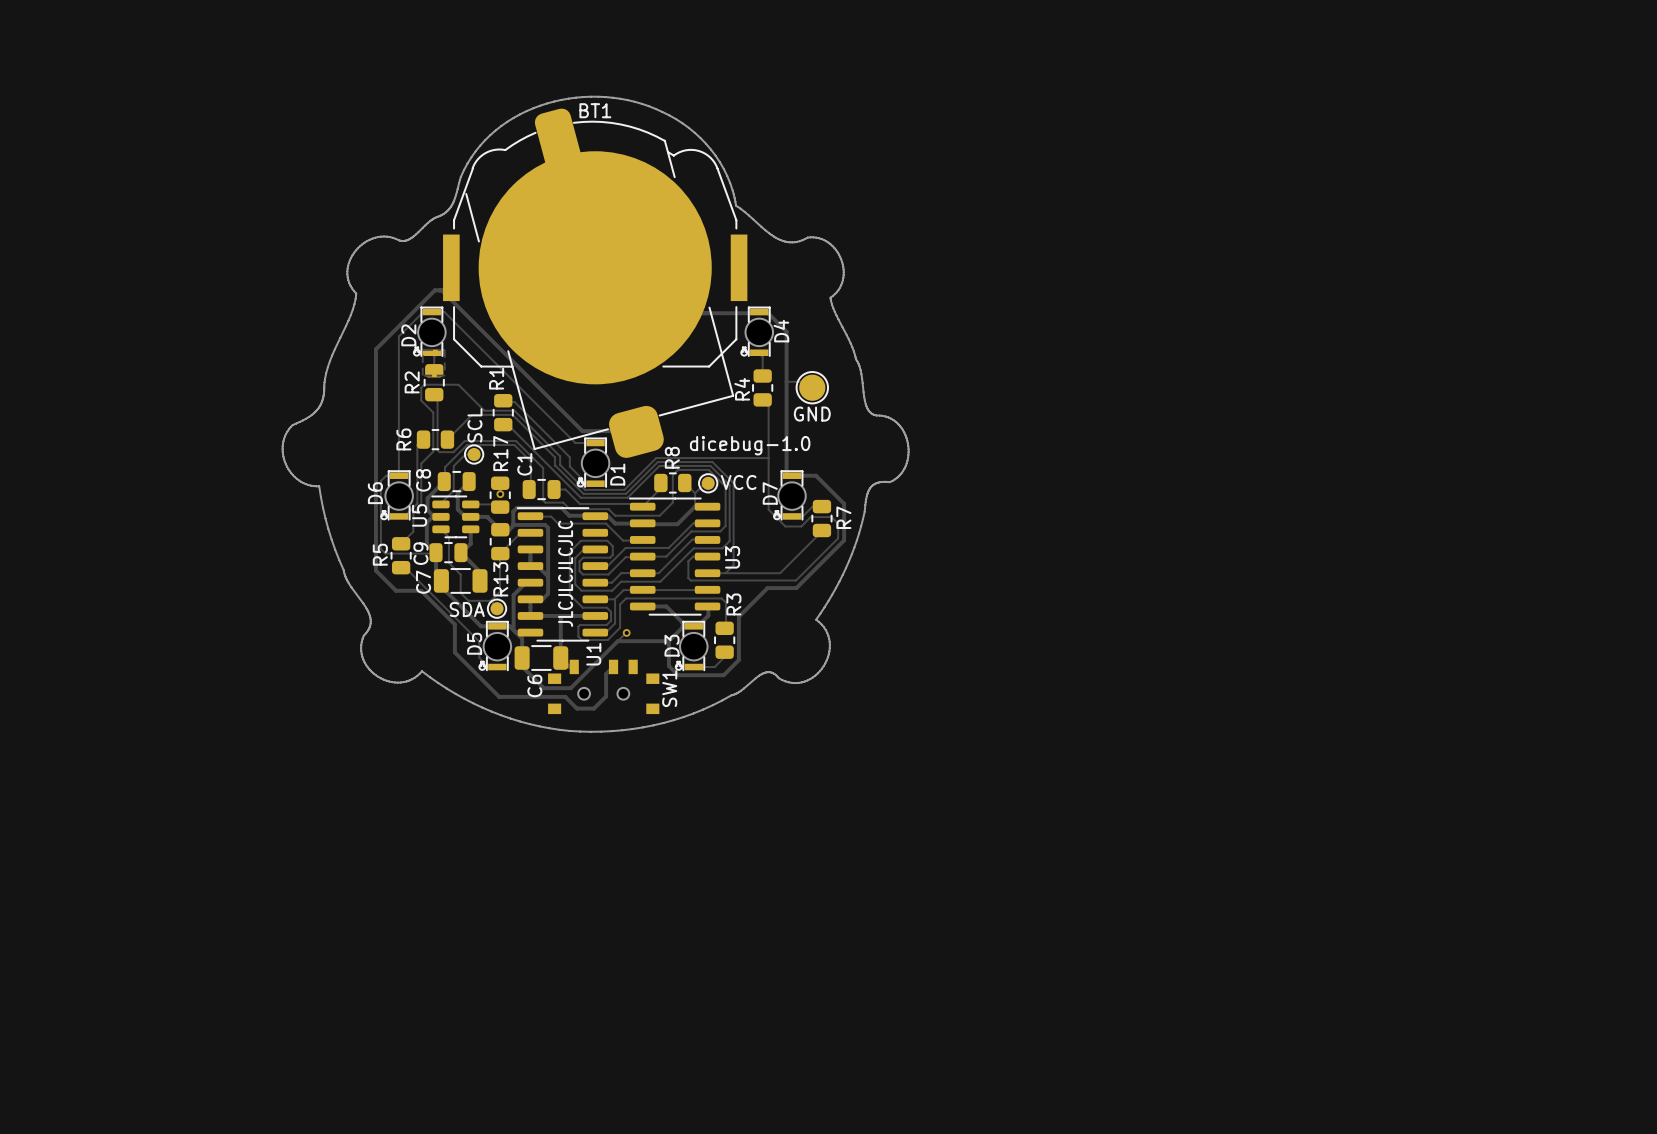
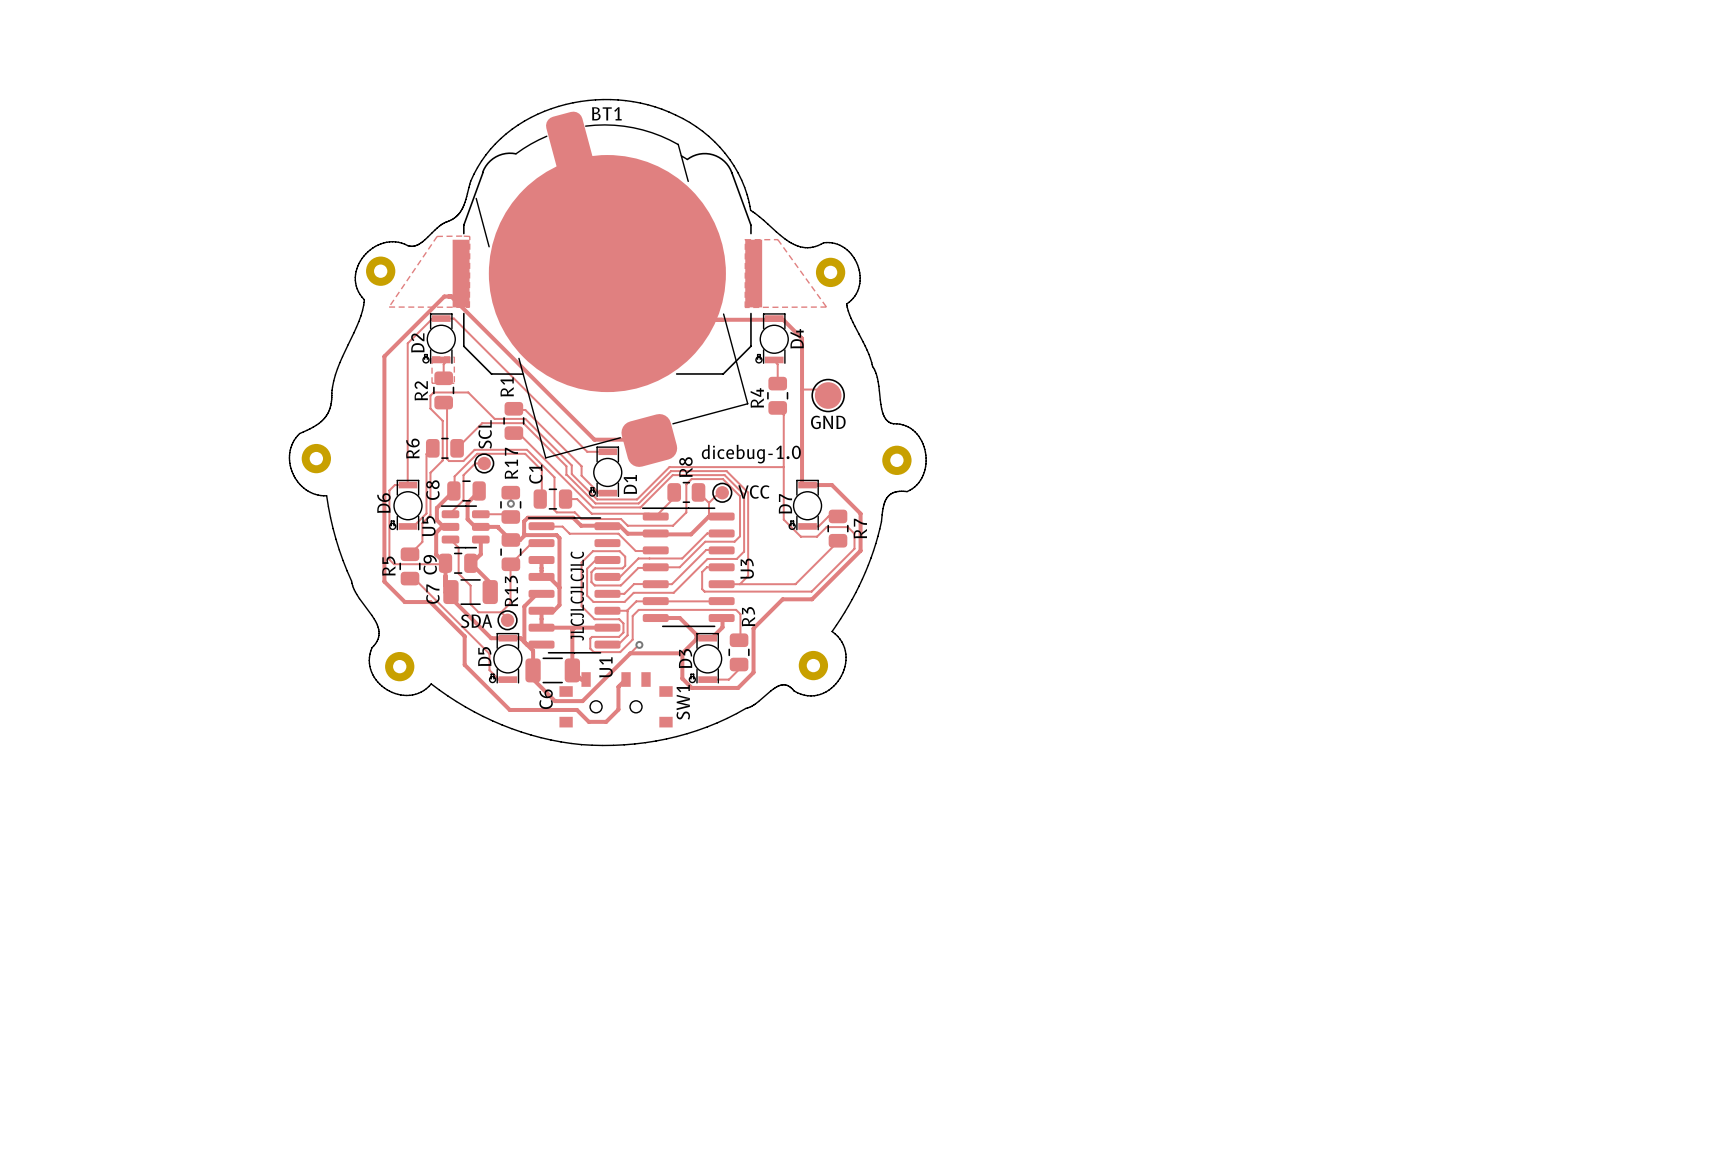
zone outline: none -> (462, 236) (437, 236) (389, 307) (469, 307) (469, 236) (462, 236)
zone outline: none -> (745, 239) (745, 307) (826, 307) (777, 239) (745, 239)
part: none -> (380, 271)
part: none -> (830, 272)
part: none -> (316, 458)
part: none -> (896, 460)
part: none -> (813, 665)
part: none -> (399, 666)

